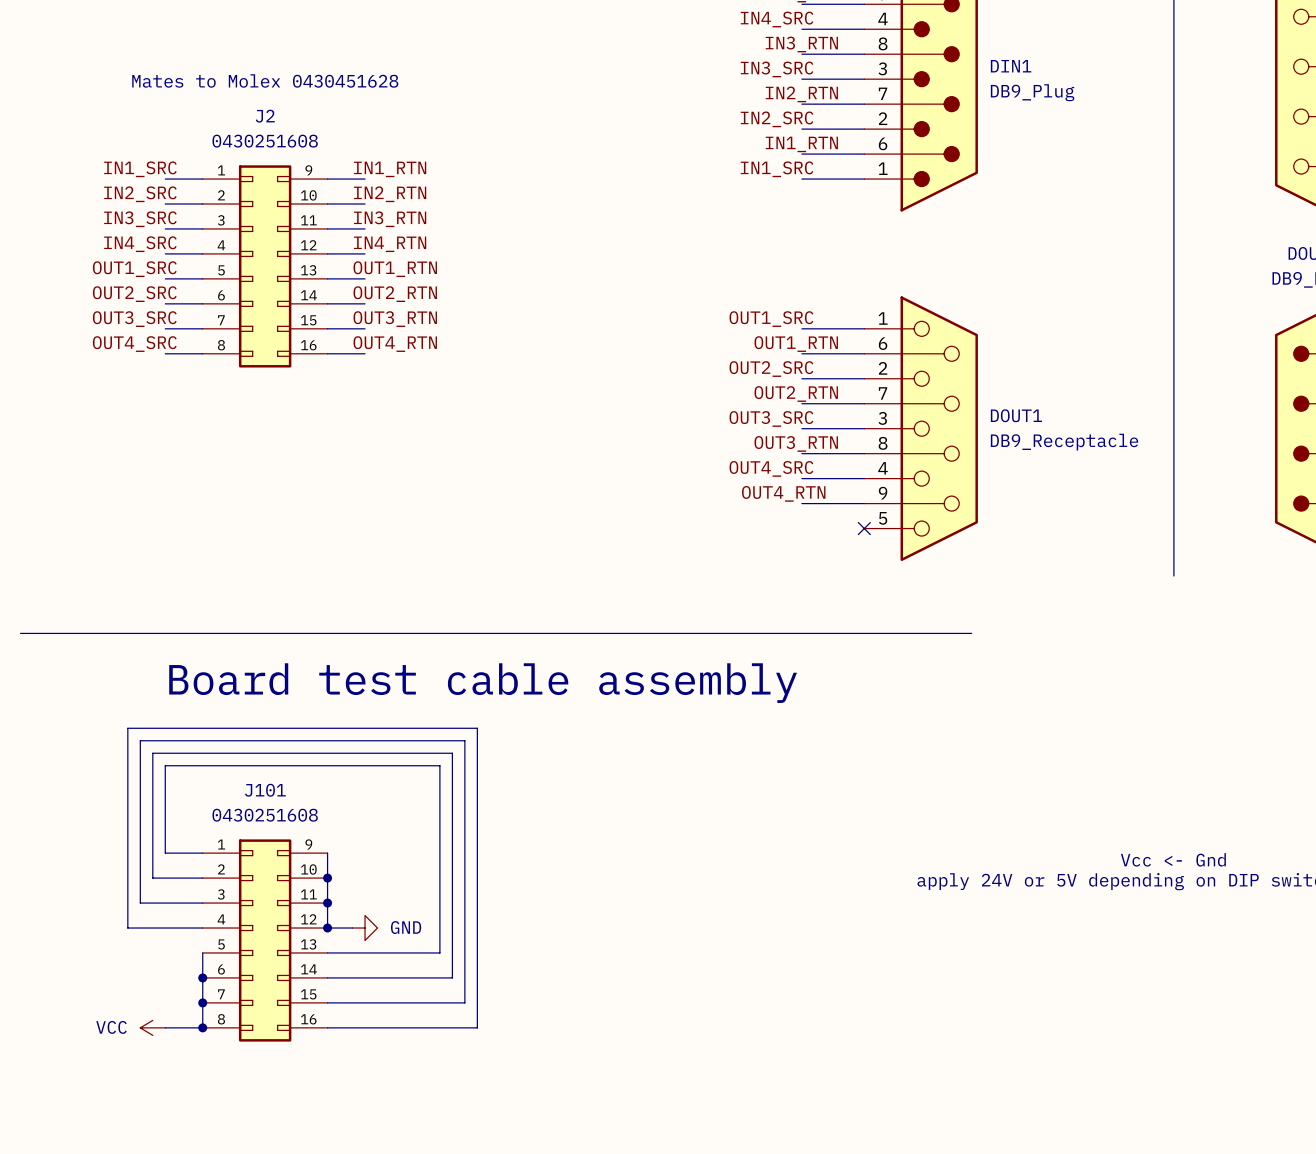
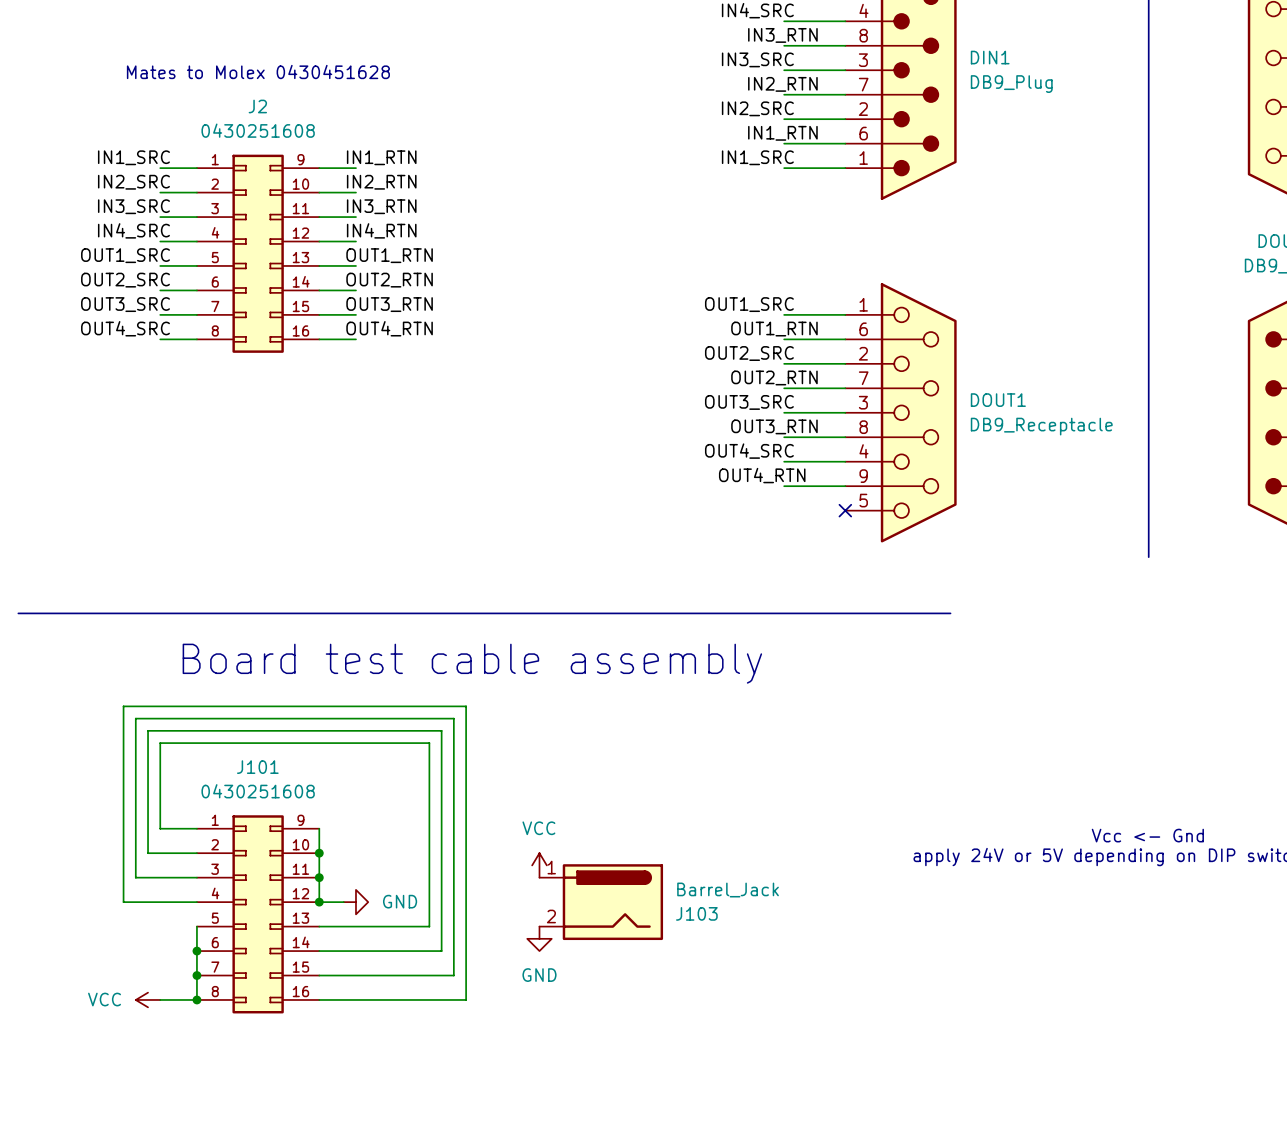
power symbol: none -> VCC (539, 865)
J103: none -> Barrel_Jack (601, 902)
power symbol: none -> GND (539, 938)

